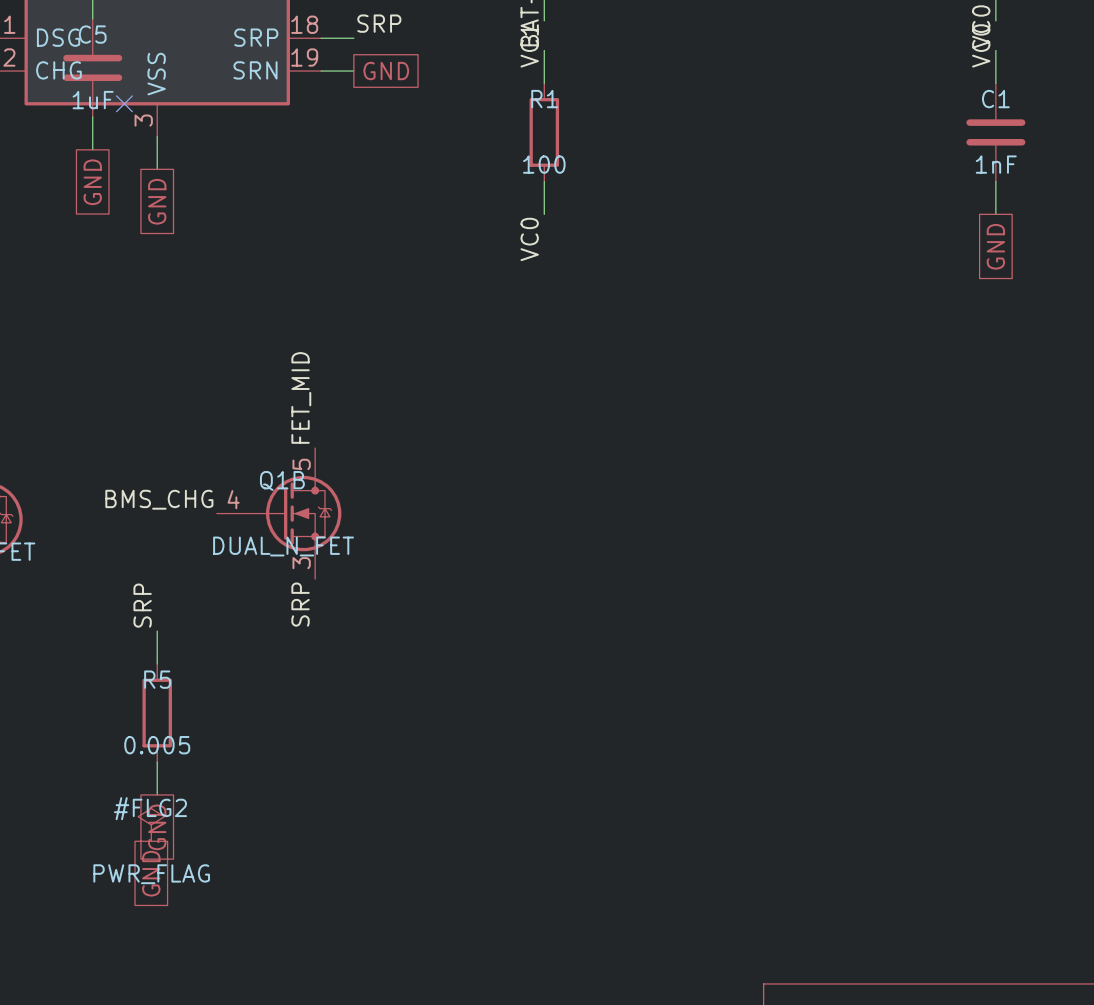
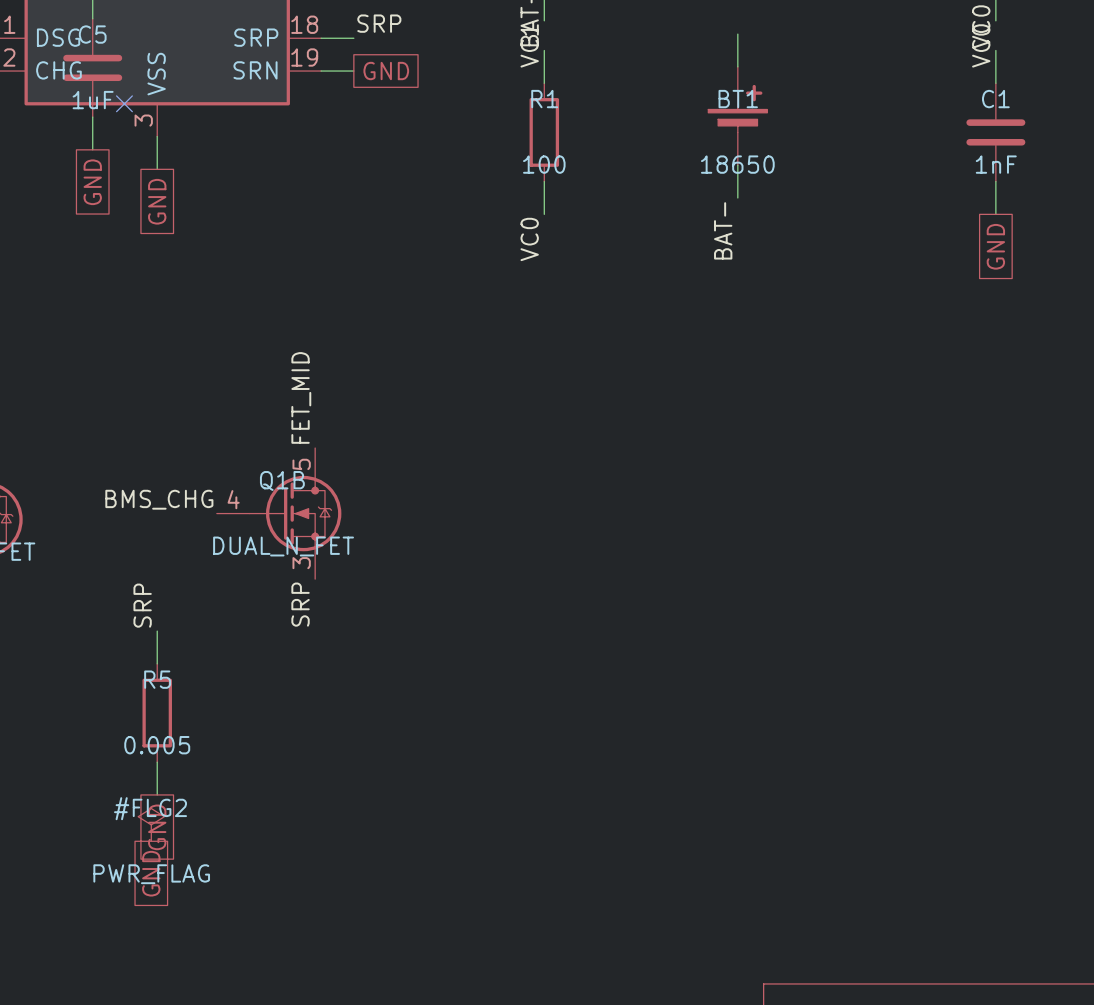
wire: none -> (737, 34) (737, 66)
BT1: none -> 18650 (737, 116)
wire: none -> (737, 165) (737, 197)
label: none -> BAT- (723, 230)

